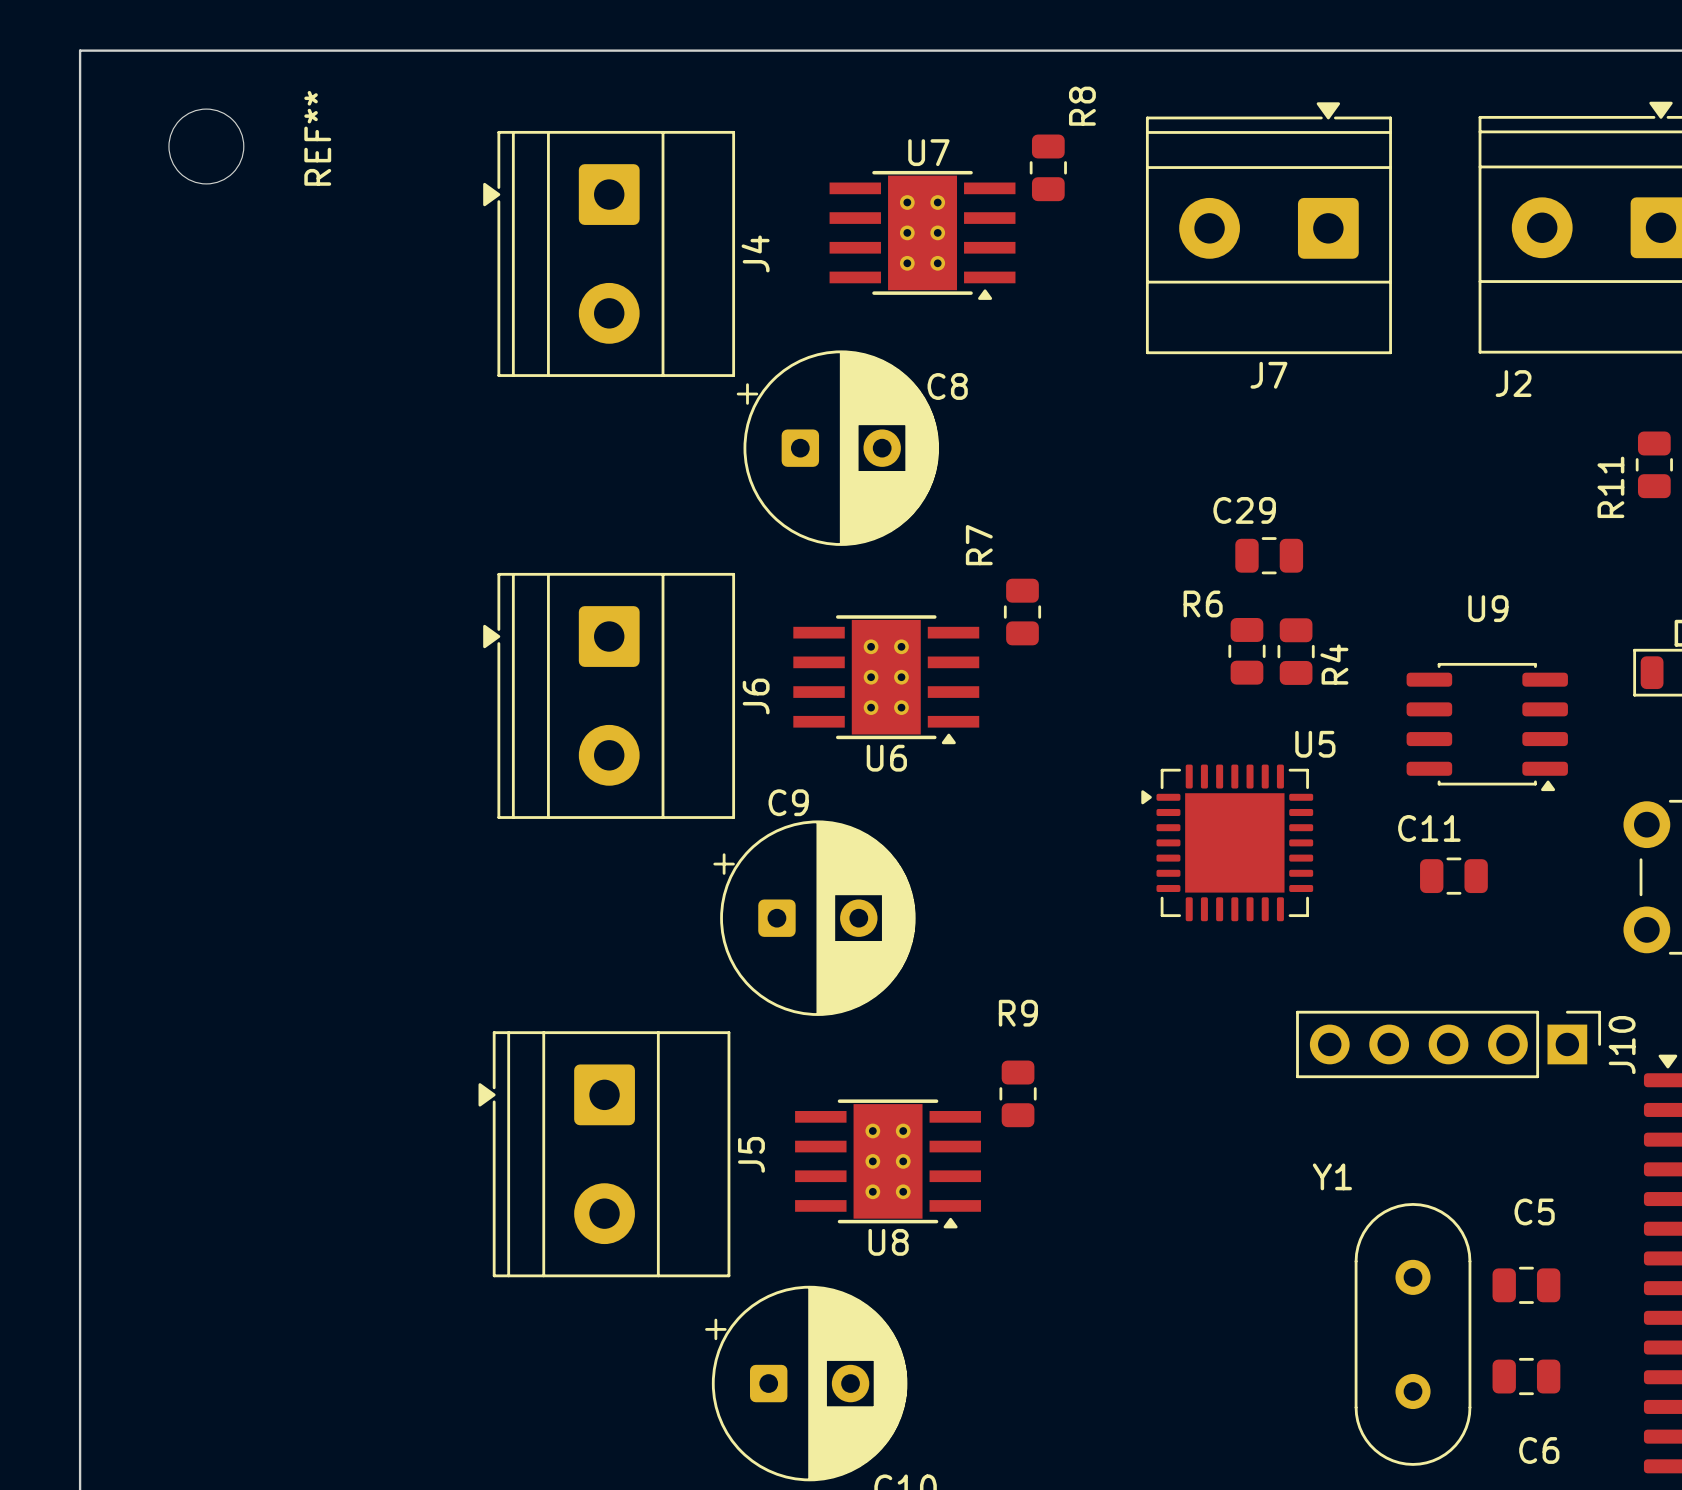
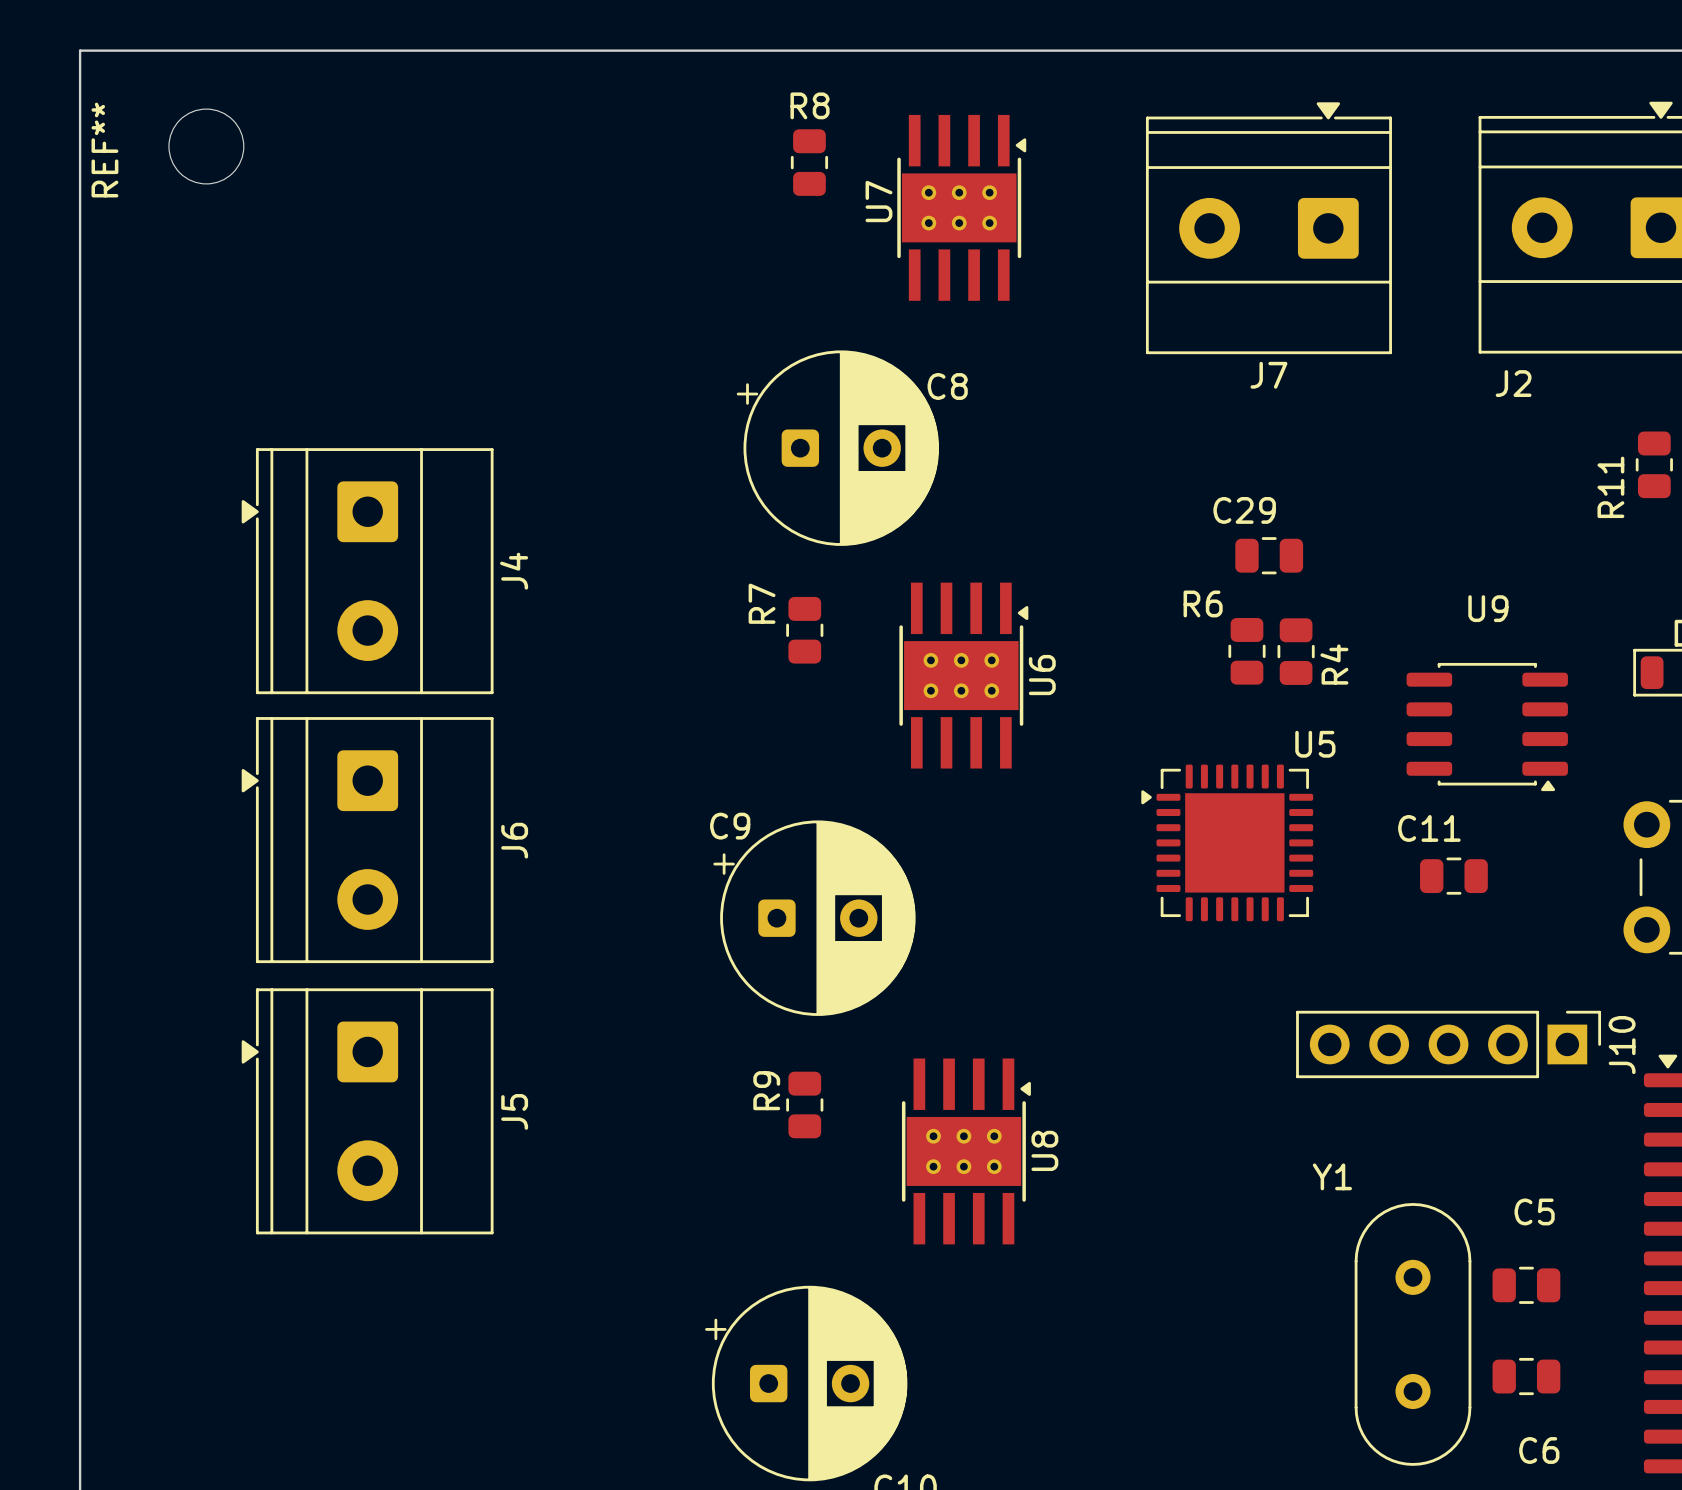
R8 name rotation: 0° (1082, 106) -> 90° clockwise (810, 105)
REF** name position: REF** (317, 138) -> REF** (104, 150)
R8 position: (1048, 167) -> (809, 162)
U7 rotation: 0° (922, 235) -> 90° counterclockwise (961, 207)
J4 position: (609, 253) -> (367, 571)
R7 name position: R7 (979, 545) -> R7 (762, 603)
R7 position: (1022, 612) -> (804, 630)
U6 rotation: 0° (886, 679) -> 90° counterclockwise (963, 675)
J6 position: (609, 695) -> (367, 840)
C9 name position: C9 (788, 802) -> C9 (730, 826)
R9 name rotation: 0° (1018, 1013) -> 90° counterclockwise (766, 1090)
R9 name position: R9 (1018, 1013) -> R9 (766, 1090)
R9 position: (1018, 1093) -> (804, 1104)
J5 position: (604, 1154) -> (367, 1111)
U8 rotation: 0° (888, 1163) -> 90° counterclockwise (966, 1151)

